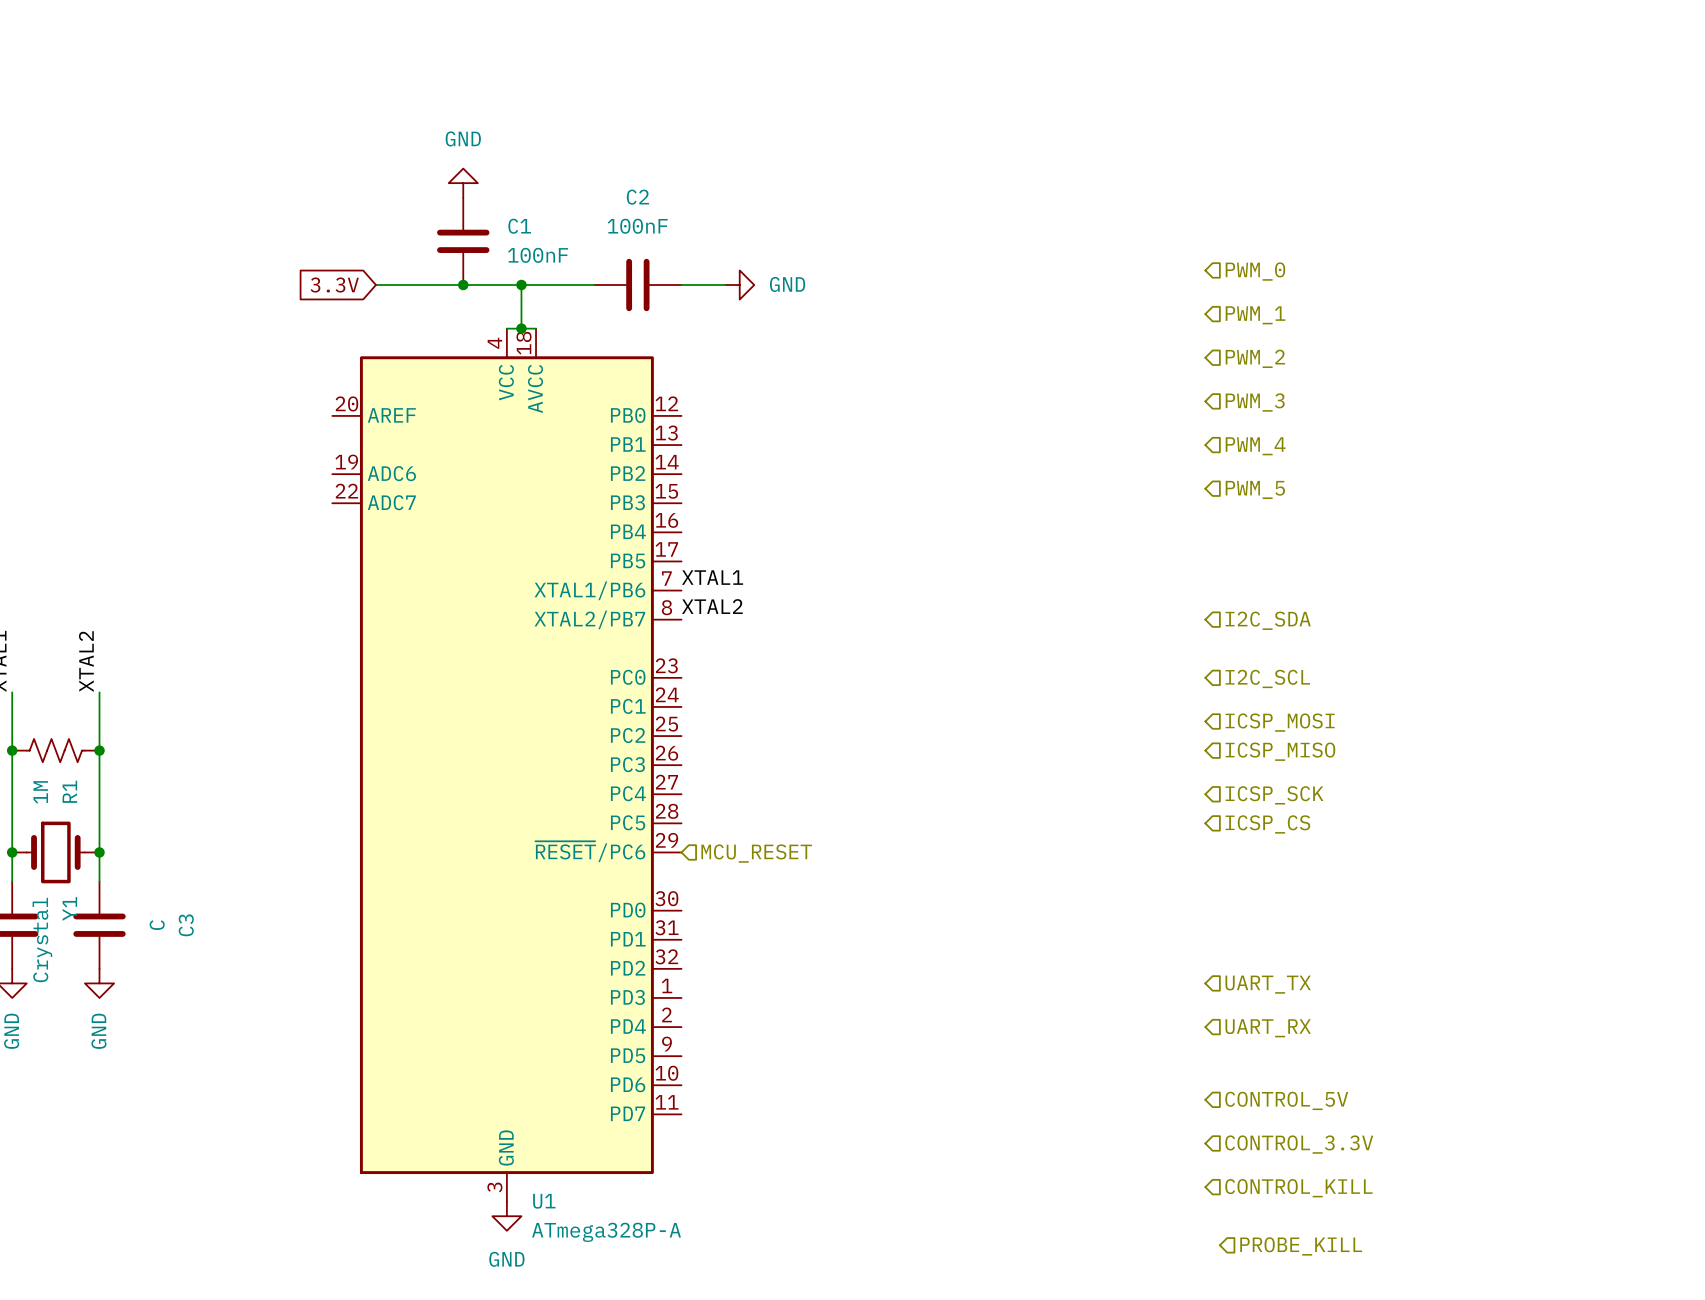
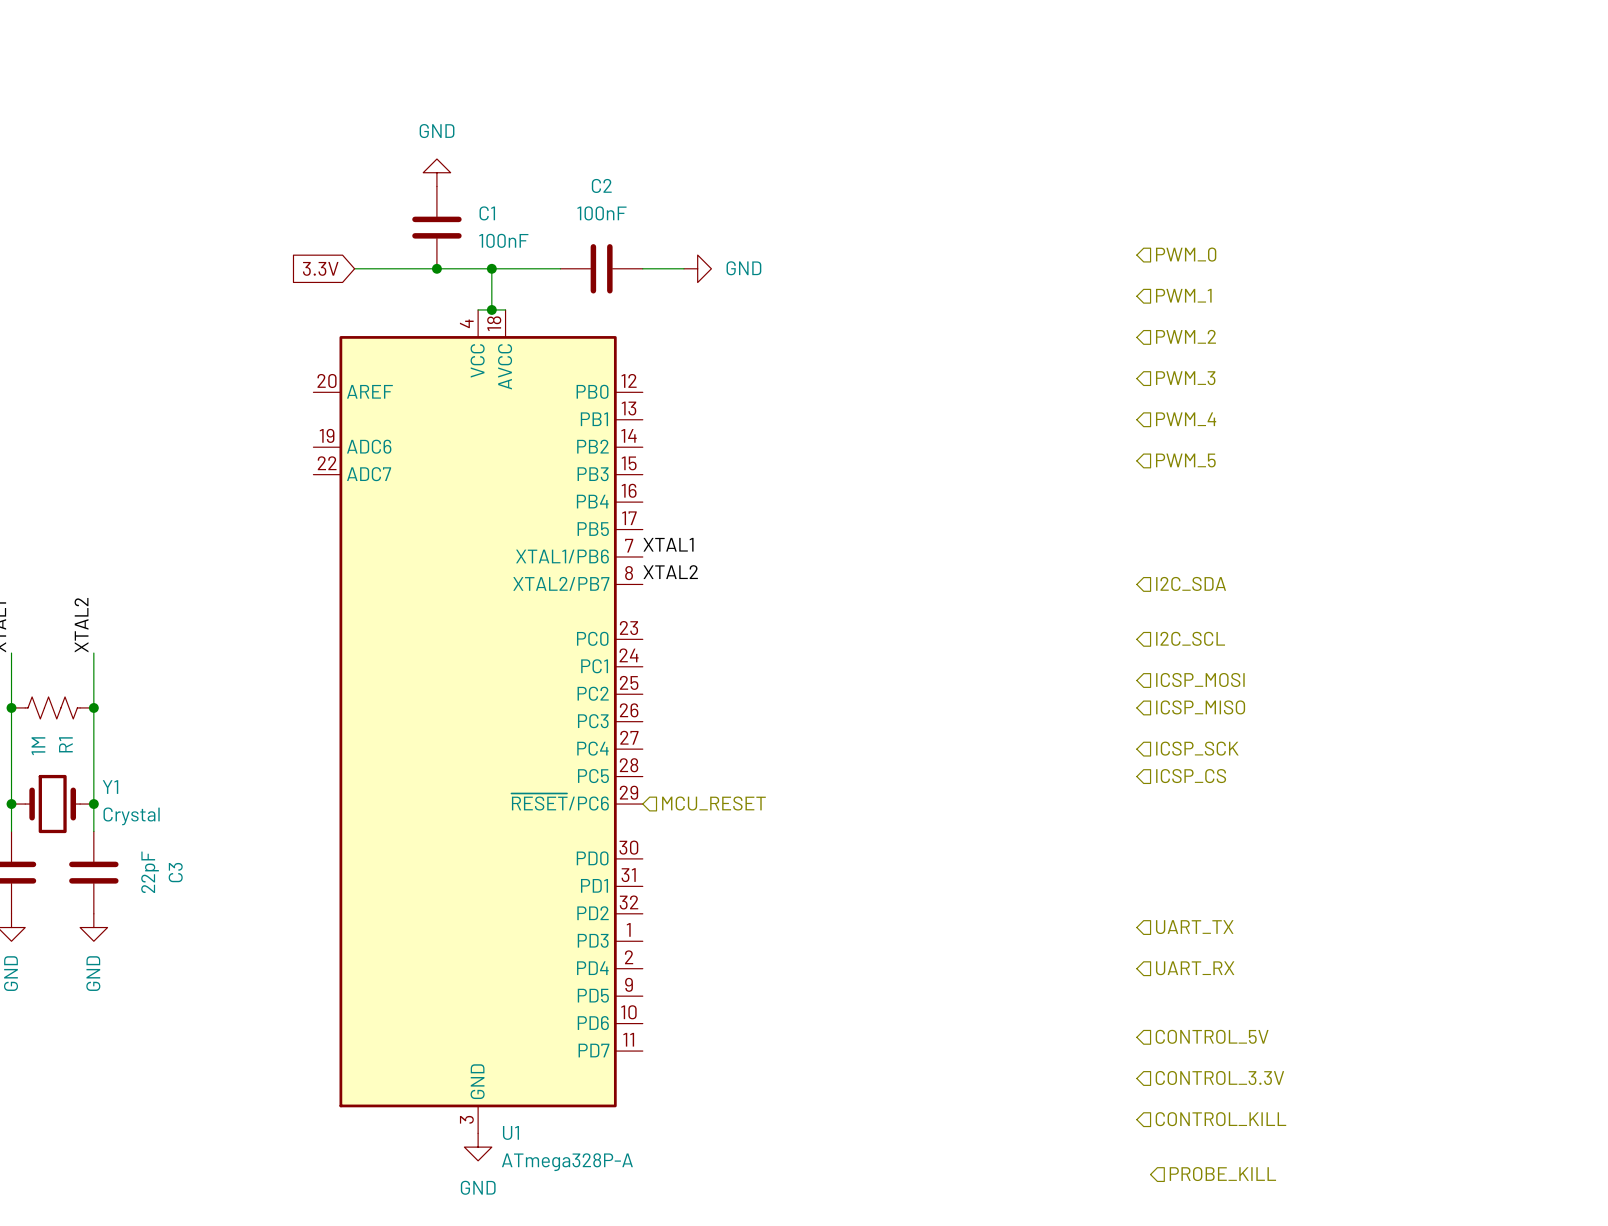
Y1 name rotation: 0° (69, 908) -> 90° clockwise (110, 787)
Y1 name position: Y1 (69, 908) -> Y1 (110, 787)
C3 value: C (157, 925) -> 22pF (150, 872)
Y1 value rotation: 0° (42, 940) -> 90° clockwise (131, 816)
Y1 value position: Crystal (42, 940) -> Crystal (131, 816)

